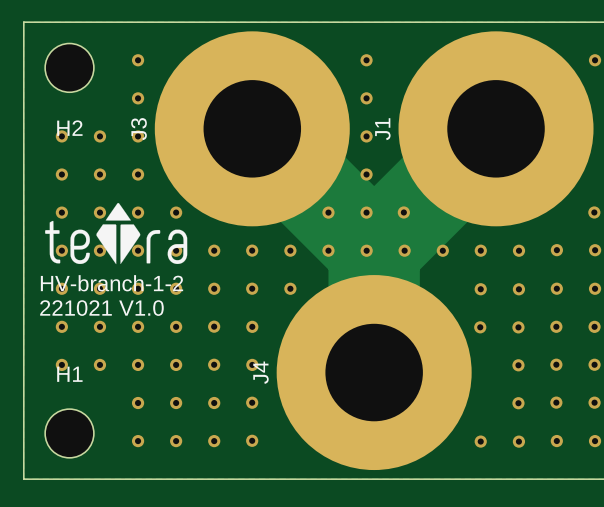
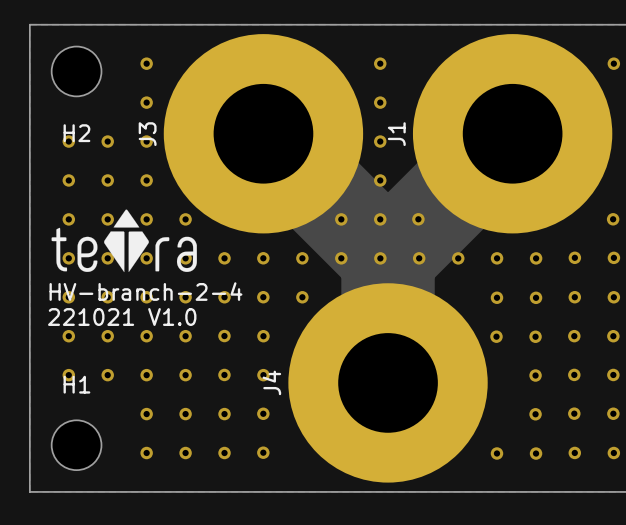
text: HV-branch-1-2 (111, 283) -> HV-branch-2-4 (145, 291)

